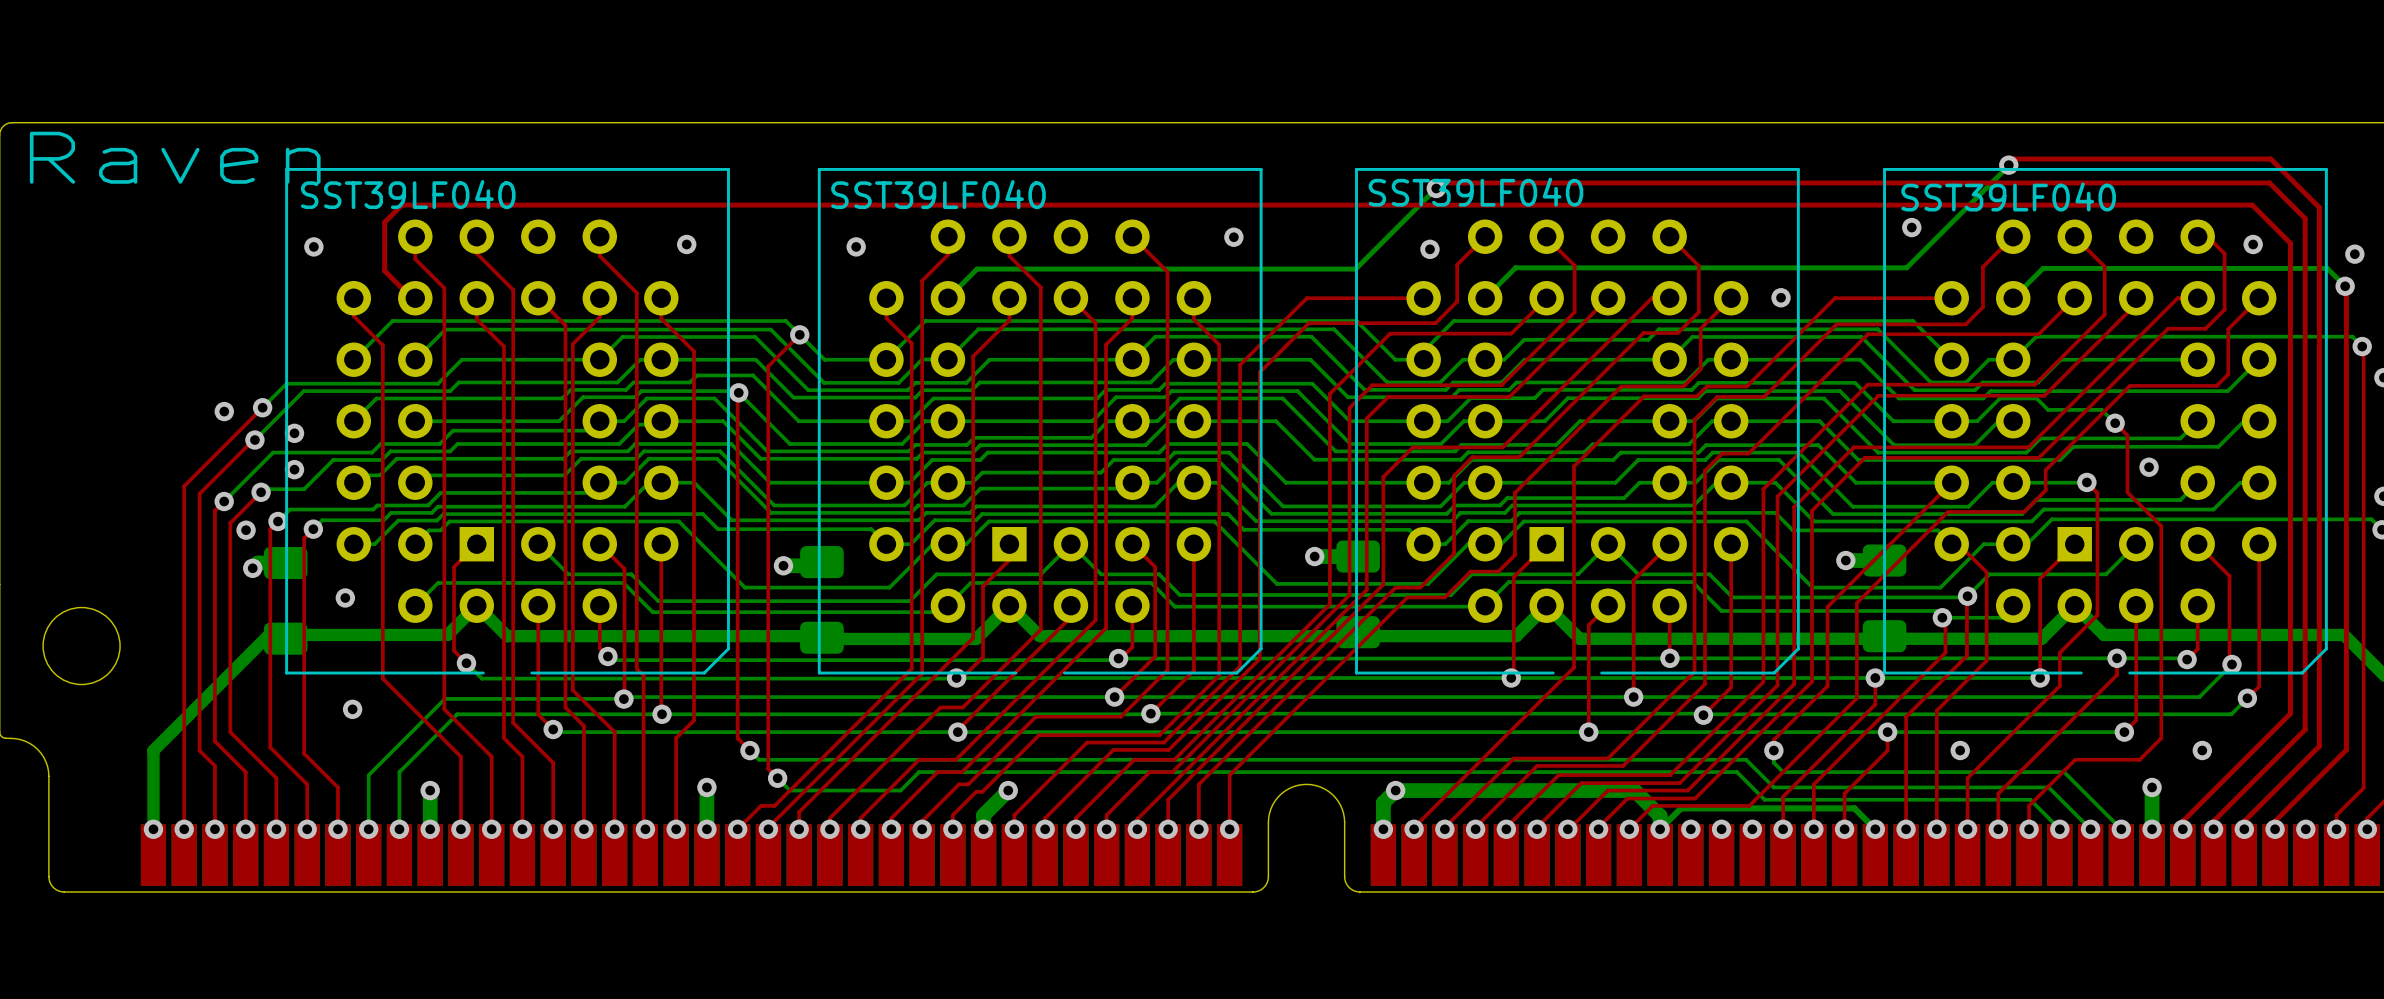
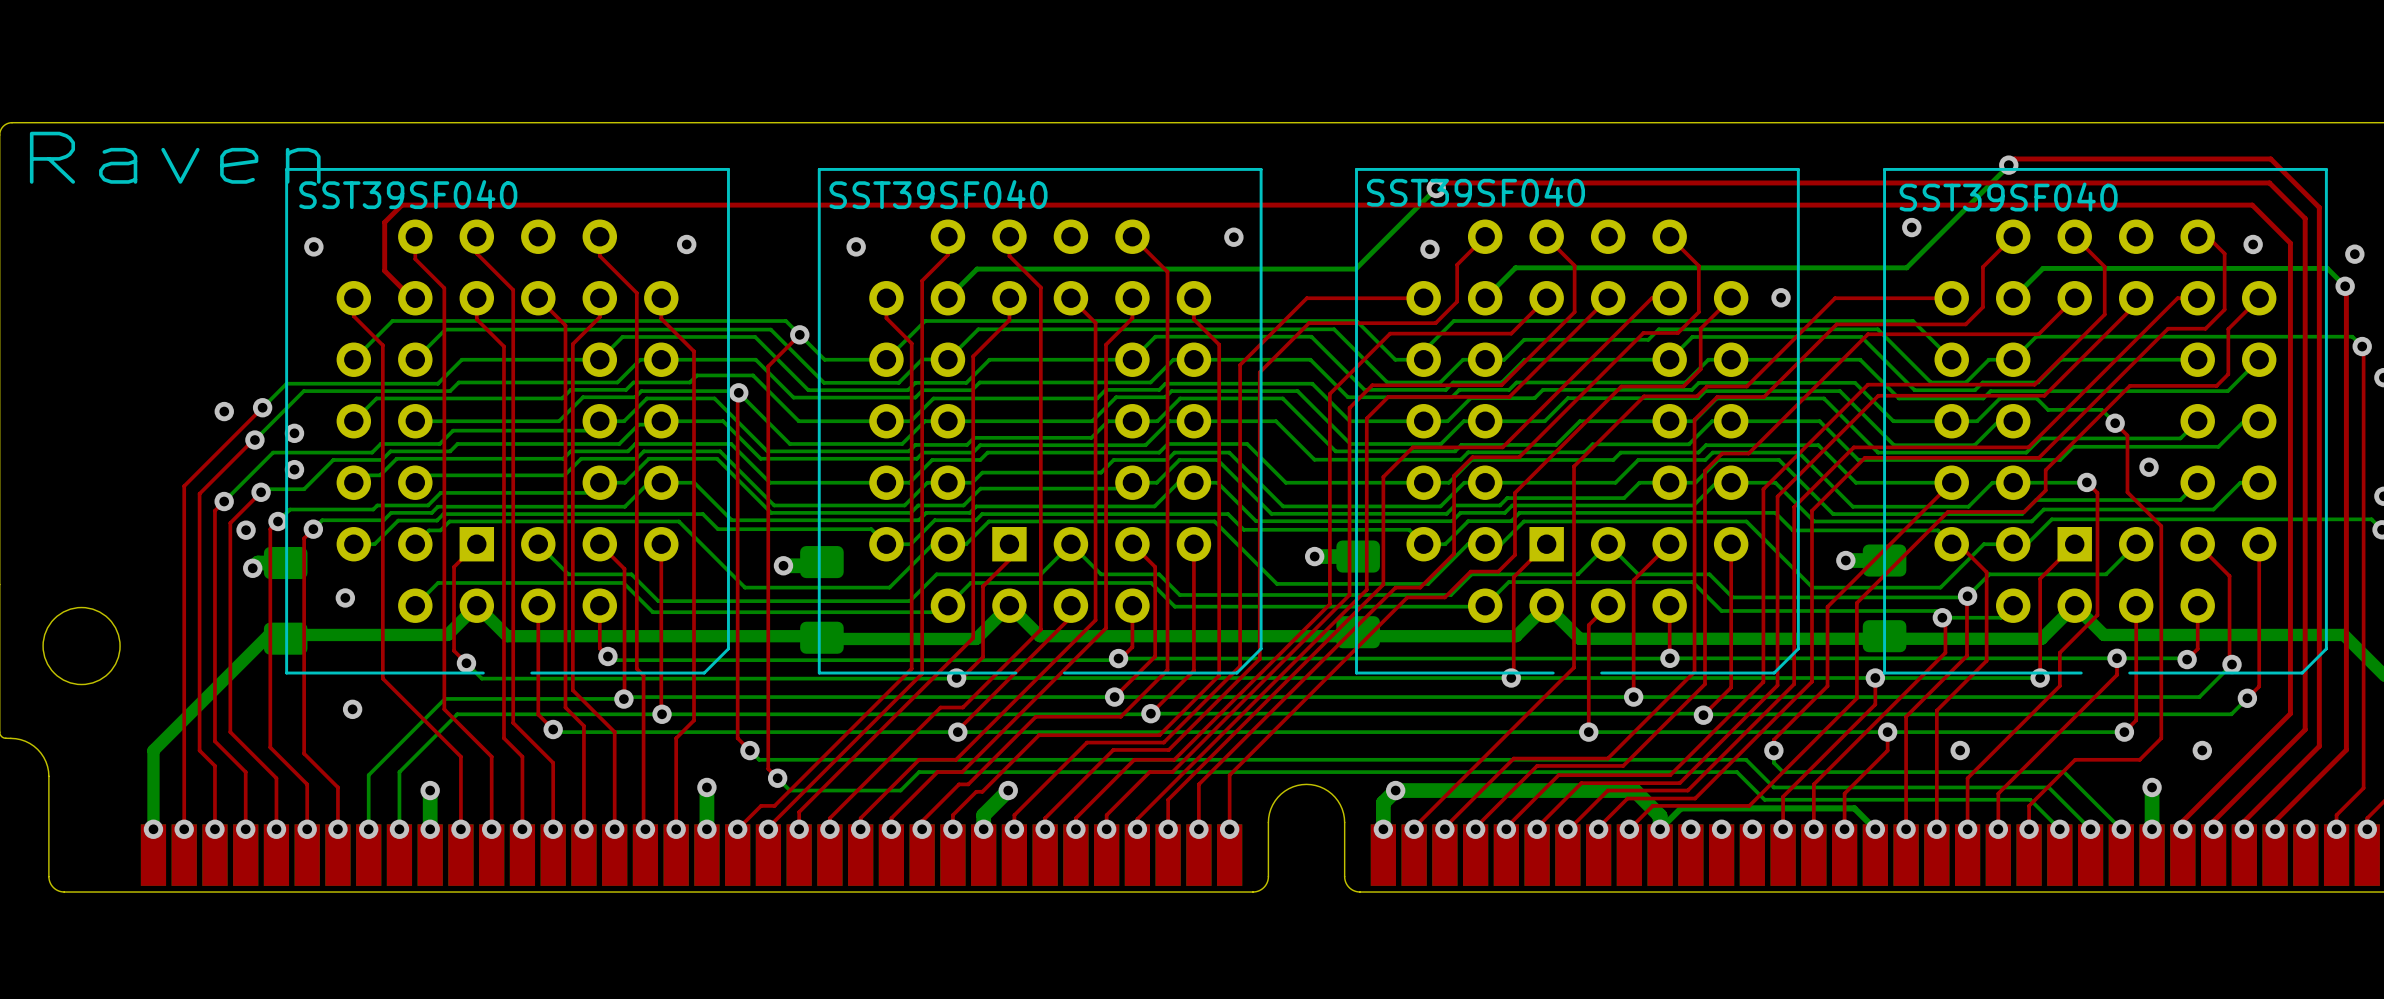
part value: SST39LF040 (1475, 192) -> SST39SF040 (1475, 192)
part value: SST39LF040 (408, 194) -> SST39SF040 (408, 194)
part value: SST39LF040 (938, 194) -> SST39SF040 (938, 194)
part value: SST39LF040 (2008, 197) -> SST39SF040 (2008, 197)

